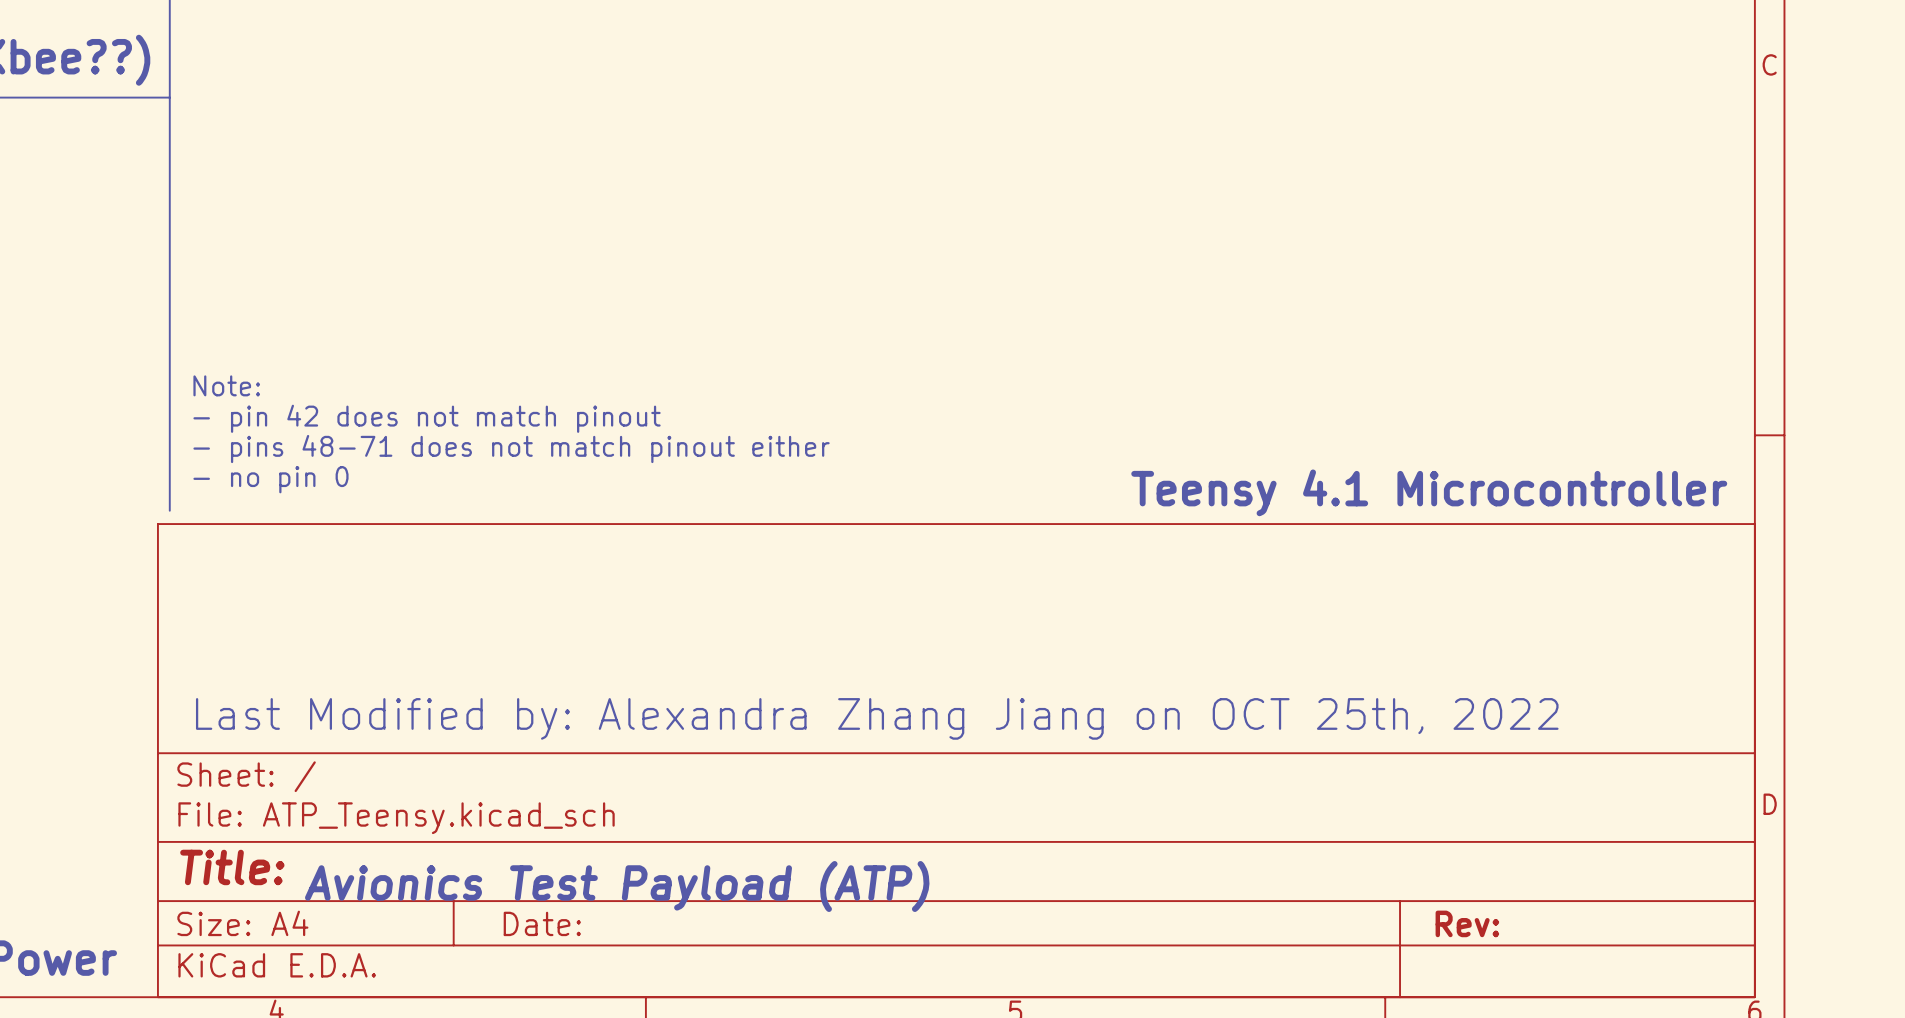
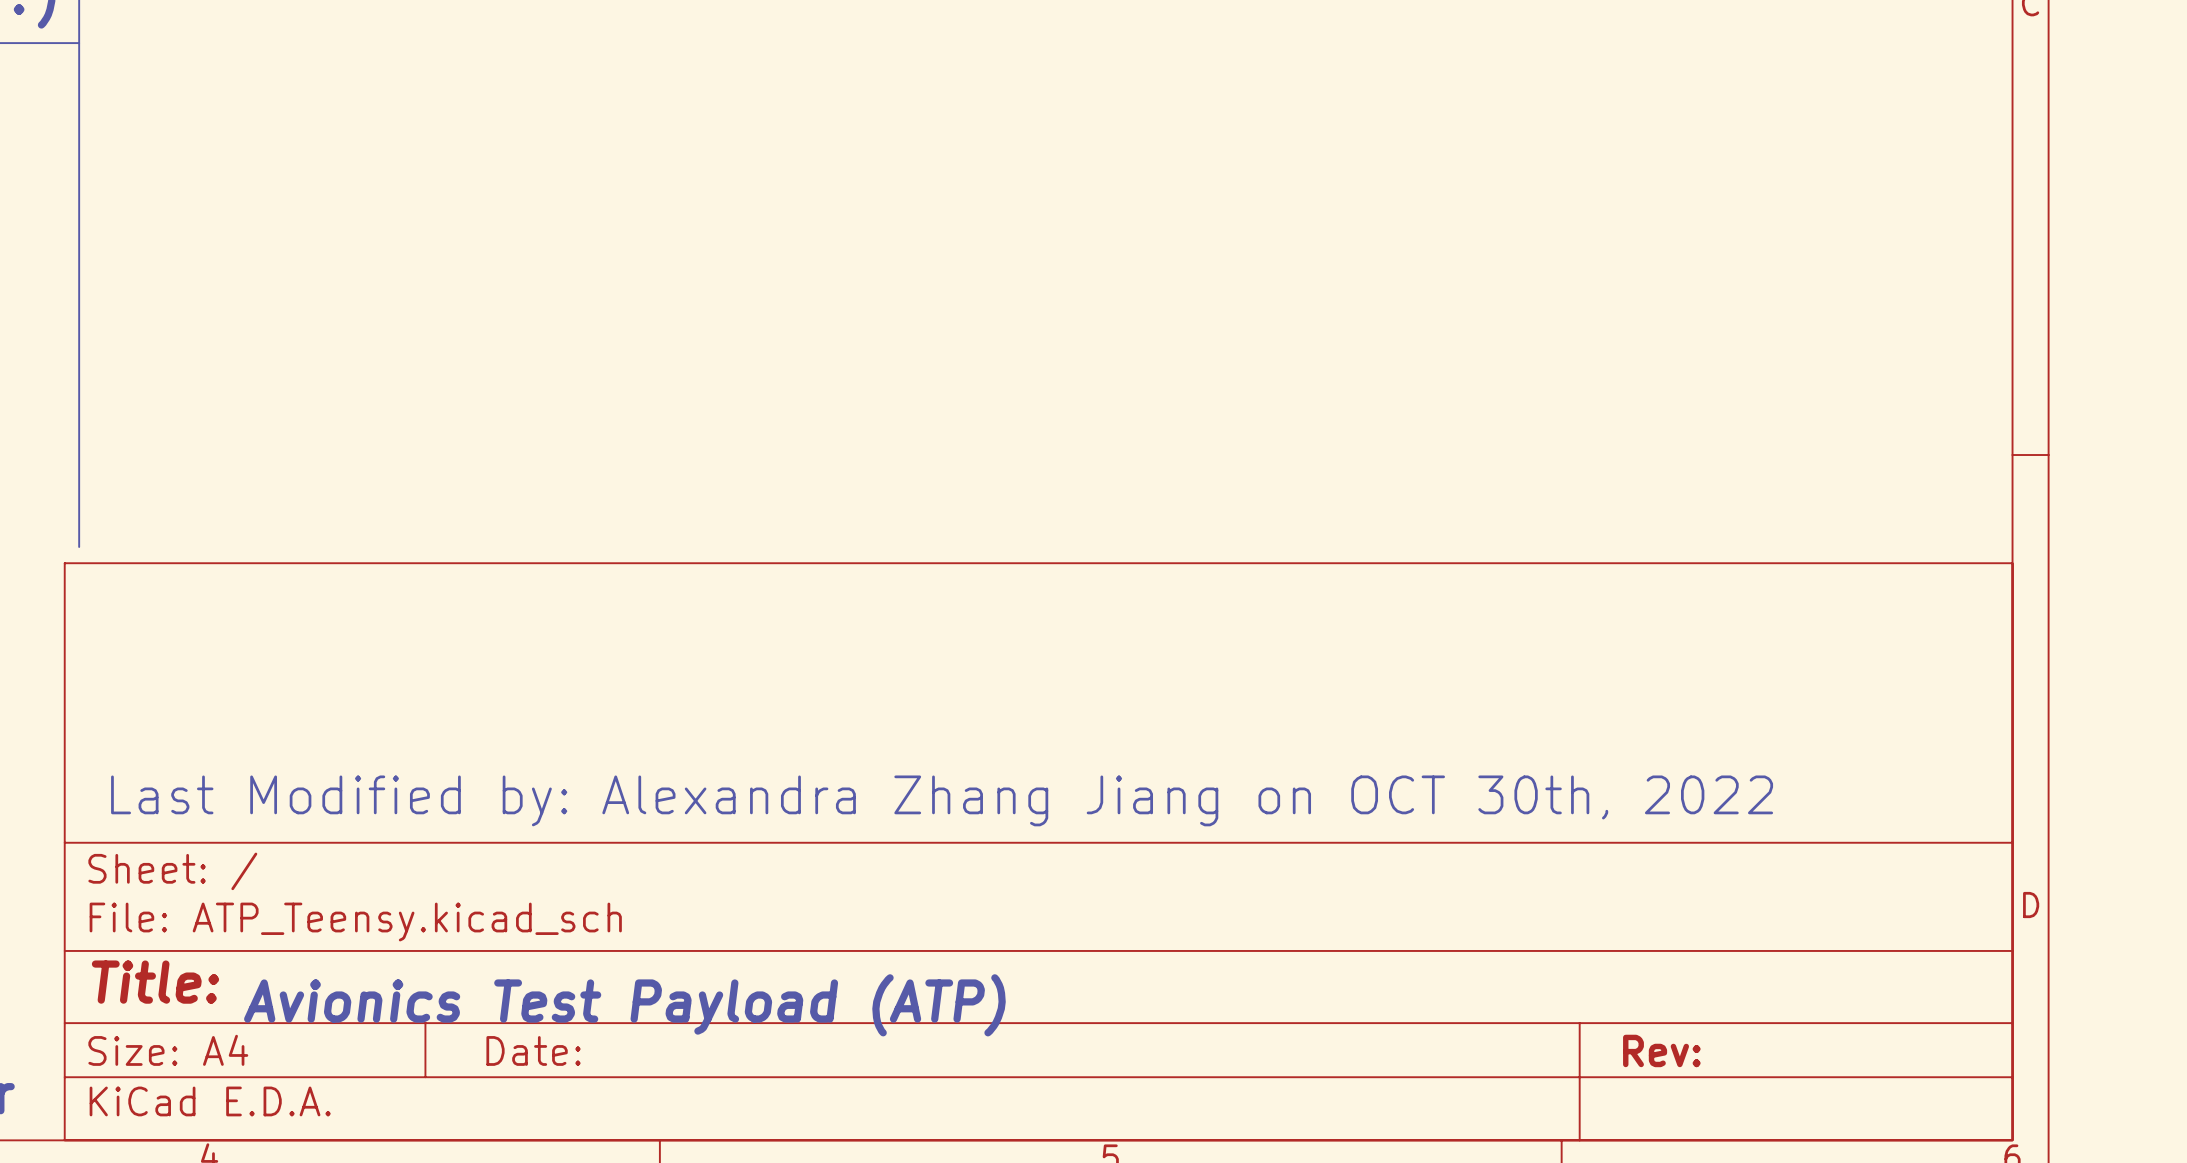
text: Note: (226, 385) -> none
text: - pin 42 does not match pinout (427, 418) -> none
text: - pins 48-71 does not match pinout either (511, 449) -> none
text: - no pin 0 (270, 479) -> none
text: Teensy 4.1 Microcontroller (1429, 492) -> none
text: Last Modified by: Alexandra Zhang Jiang on OCT 25th, 2022 (877, 718) -> Last Modified by: Alexandra Zhang Jiang on OCT 30th, 2022 (942, 800)

